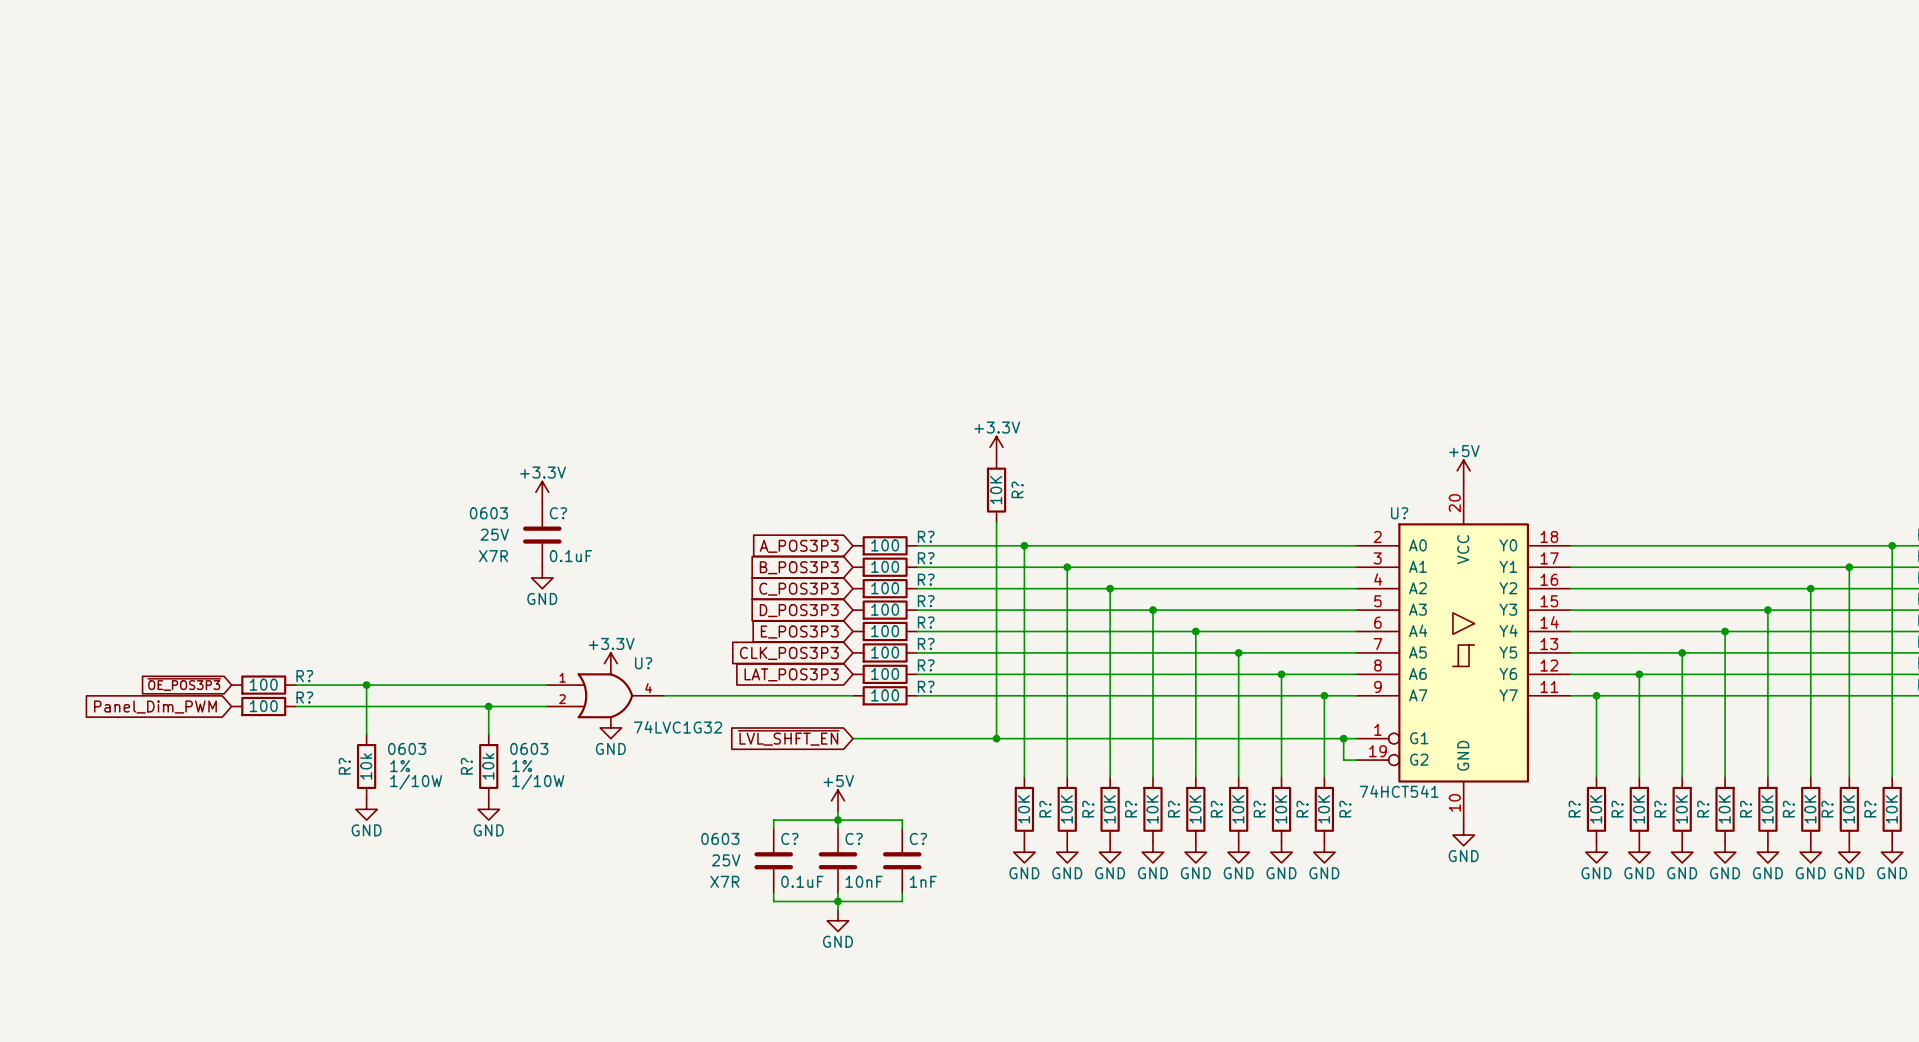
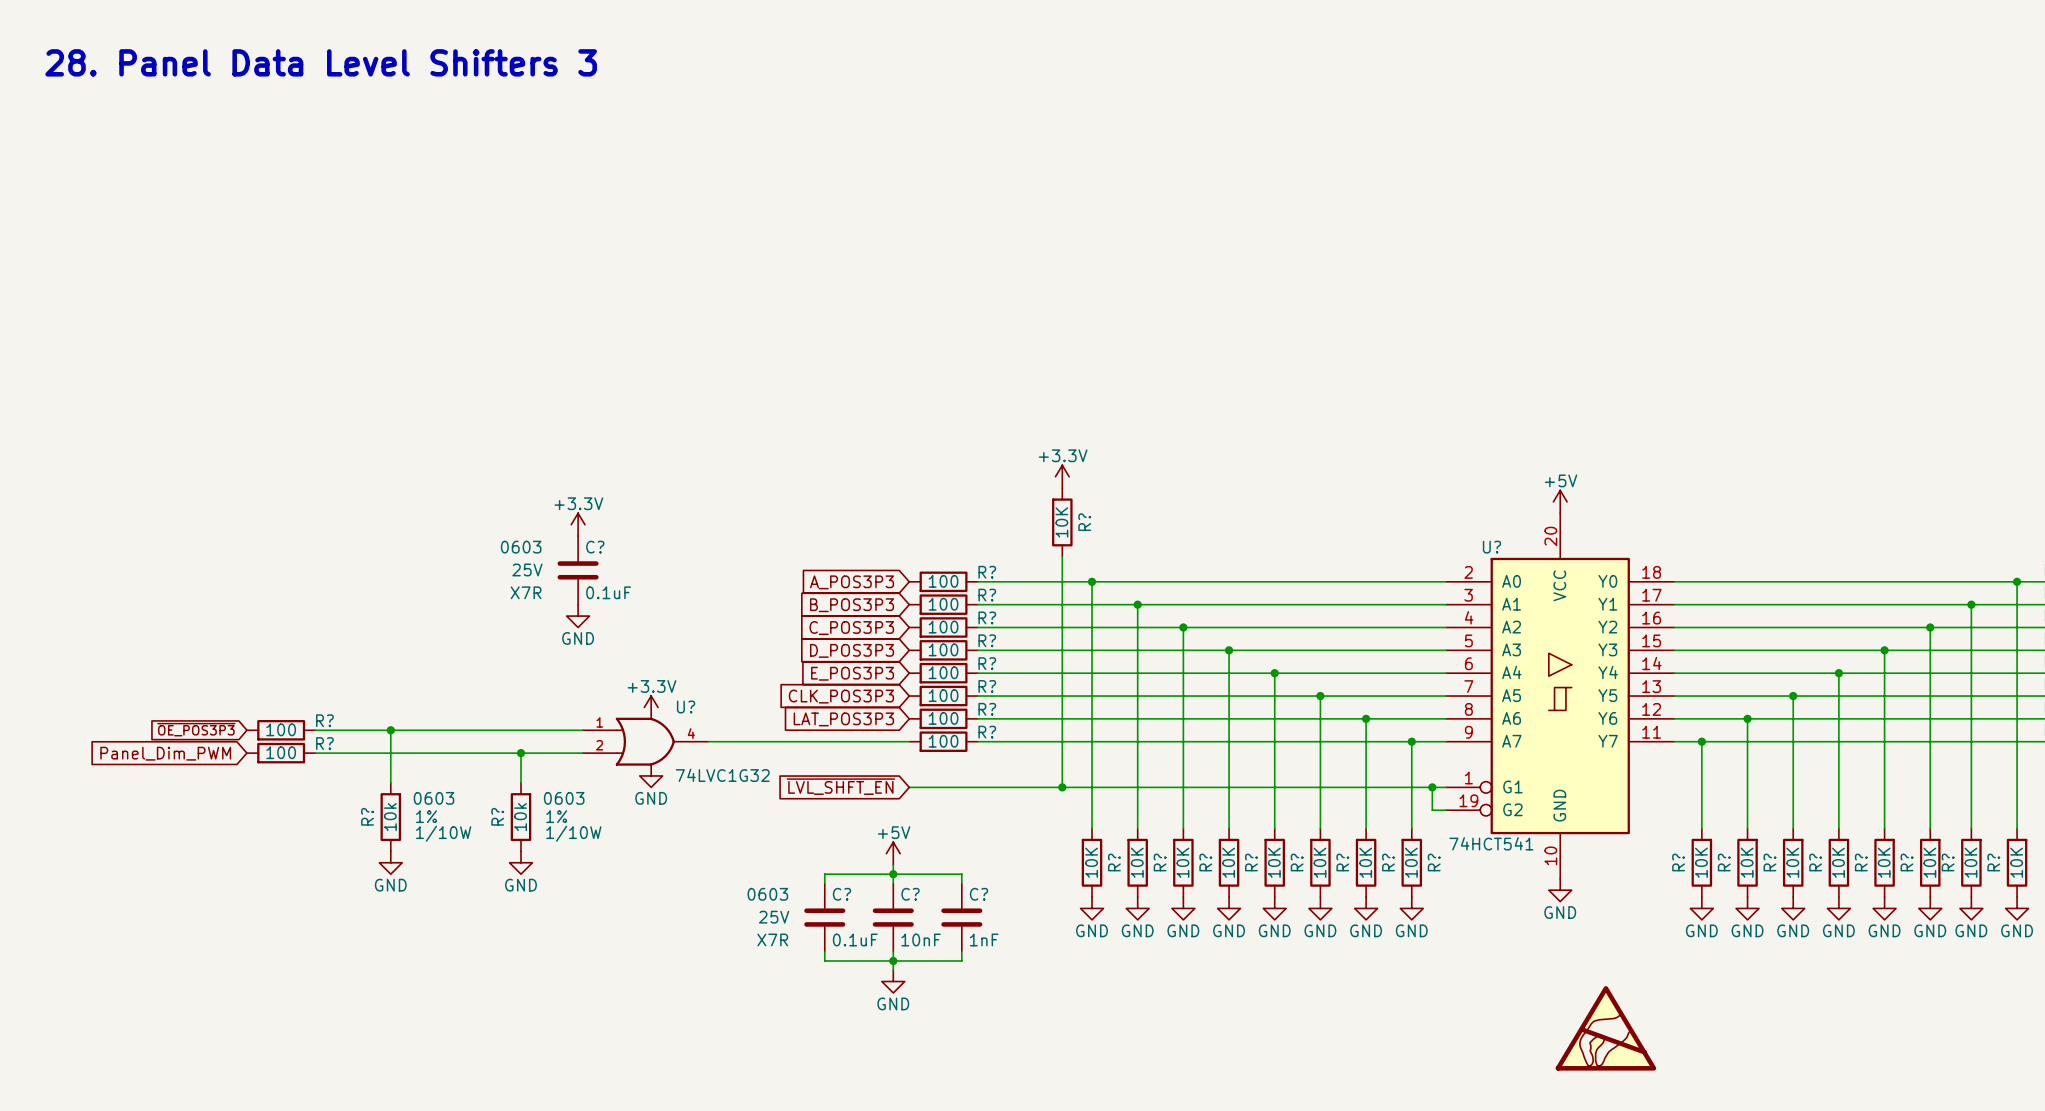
text: none -> 28. Panel Data Level Shifters 3 (321, 62)
power symbol: none -> (1605, 1028)

